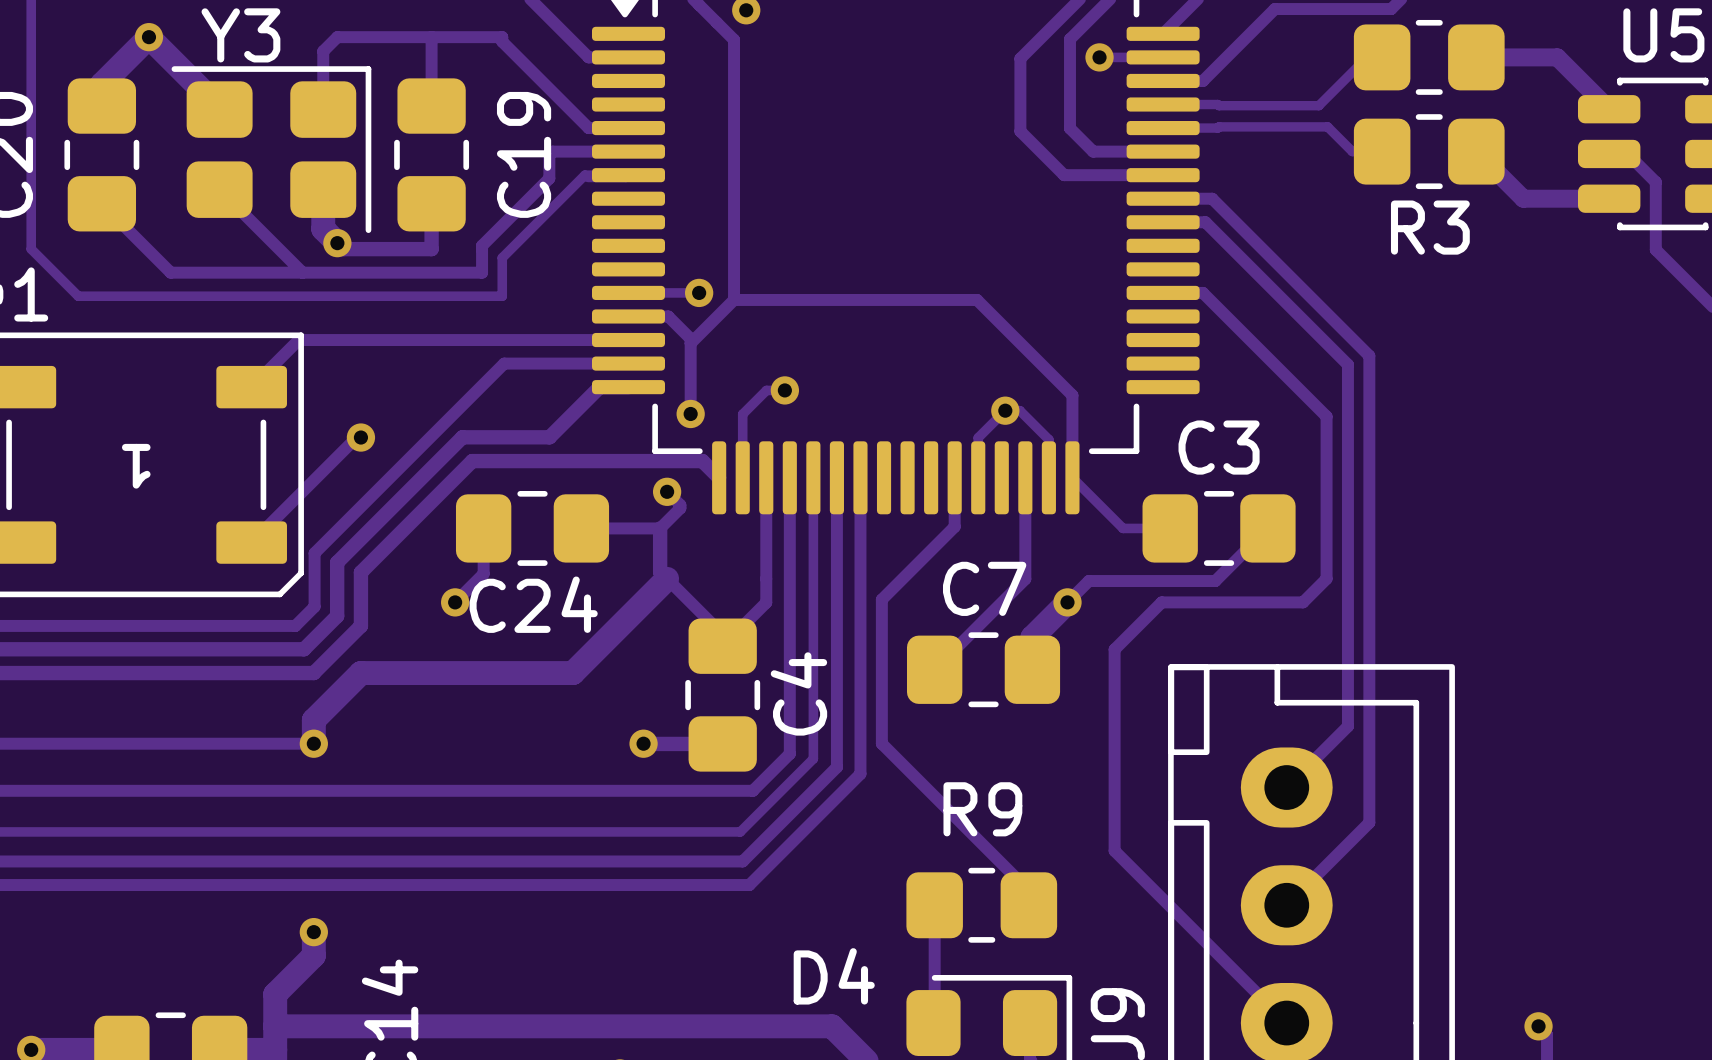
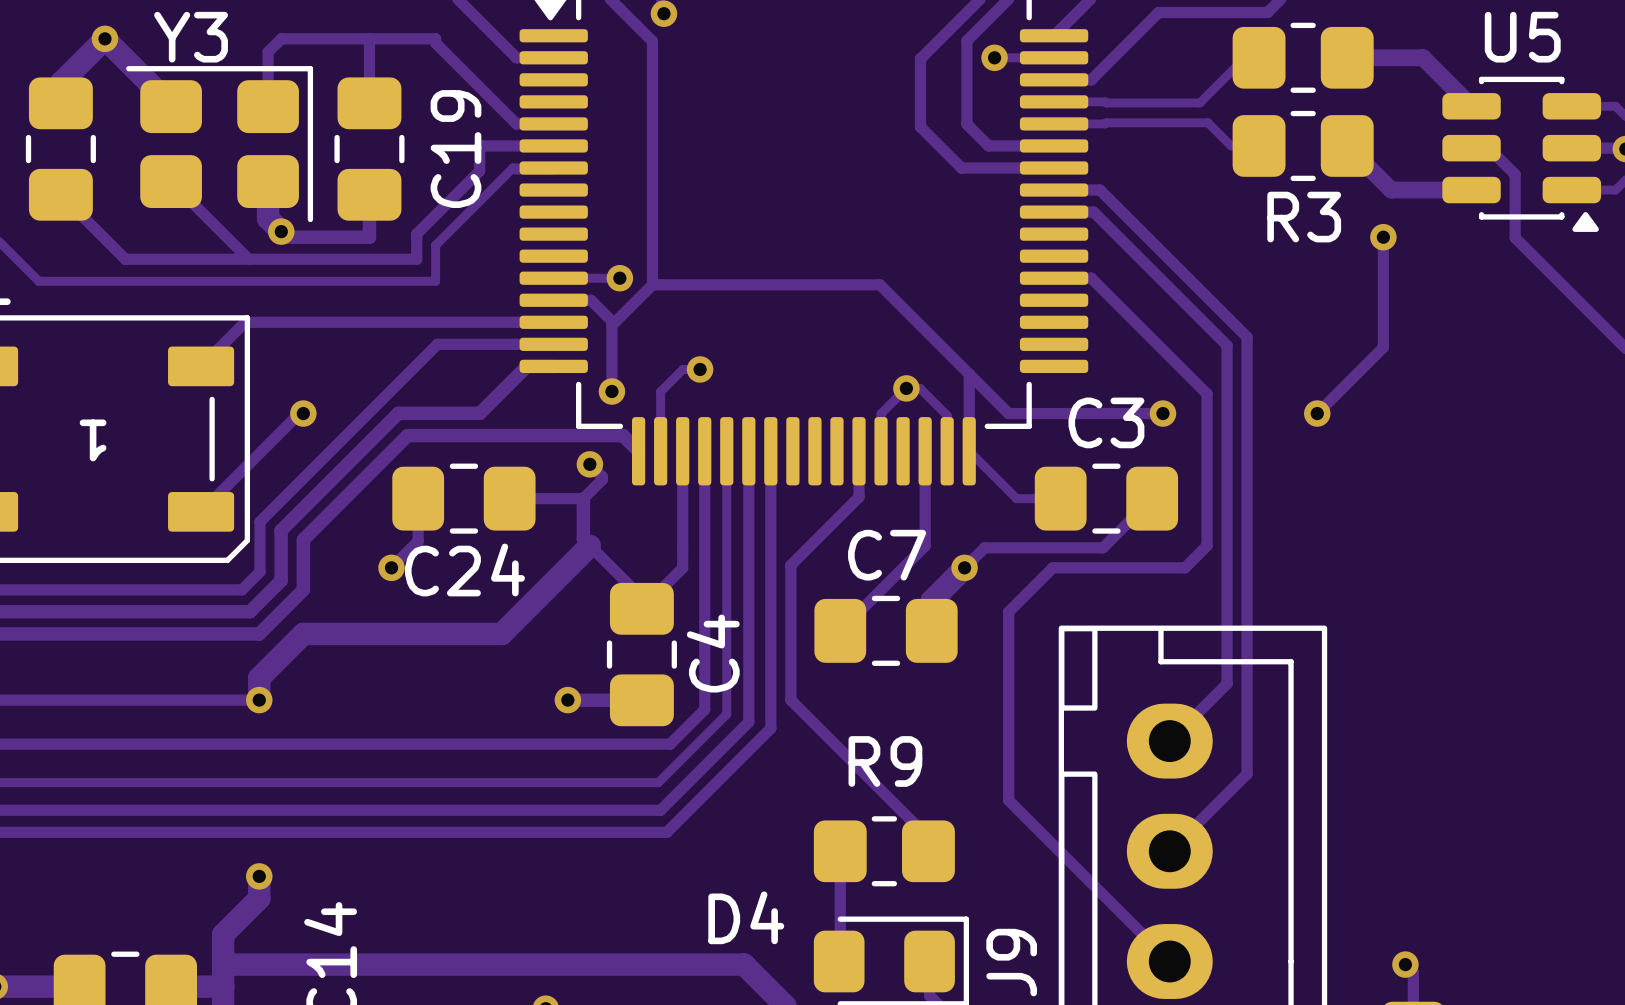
track: none -> (1383, 237) (1383, 347) (1317, 413)
via: none -> (1383, 237)
track: none -> (969, 374) (1008, 413) (1162, 413)
via: none -> (1162, 413)
via: none -> (1317, 413)

